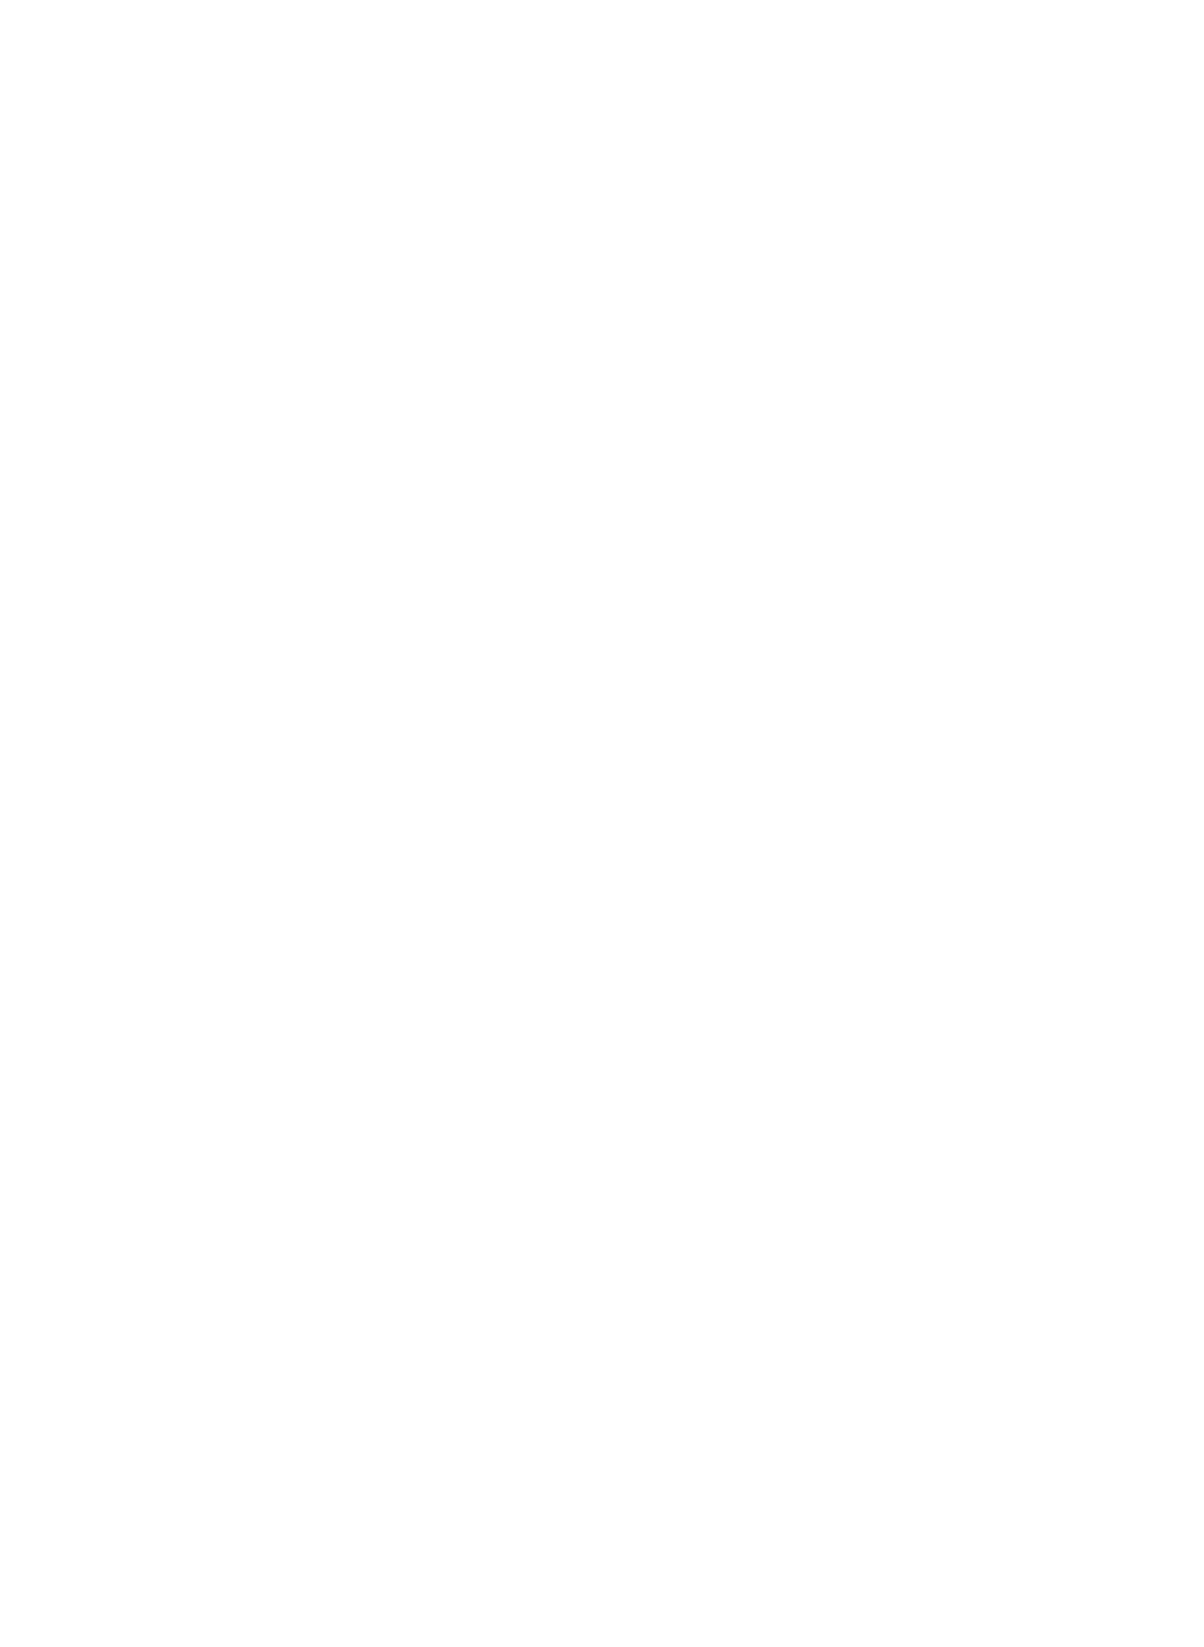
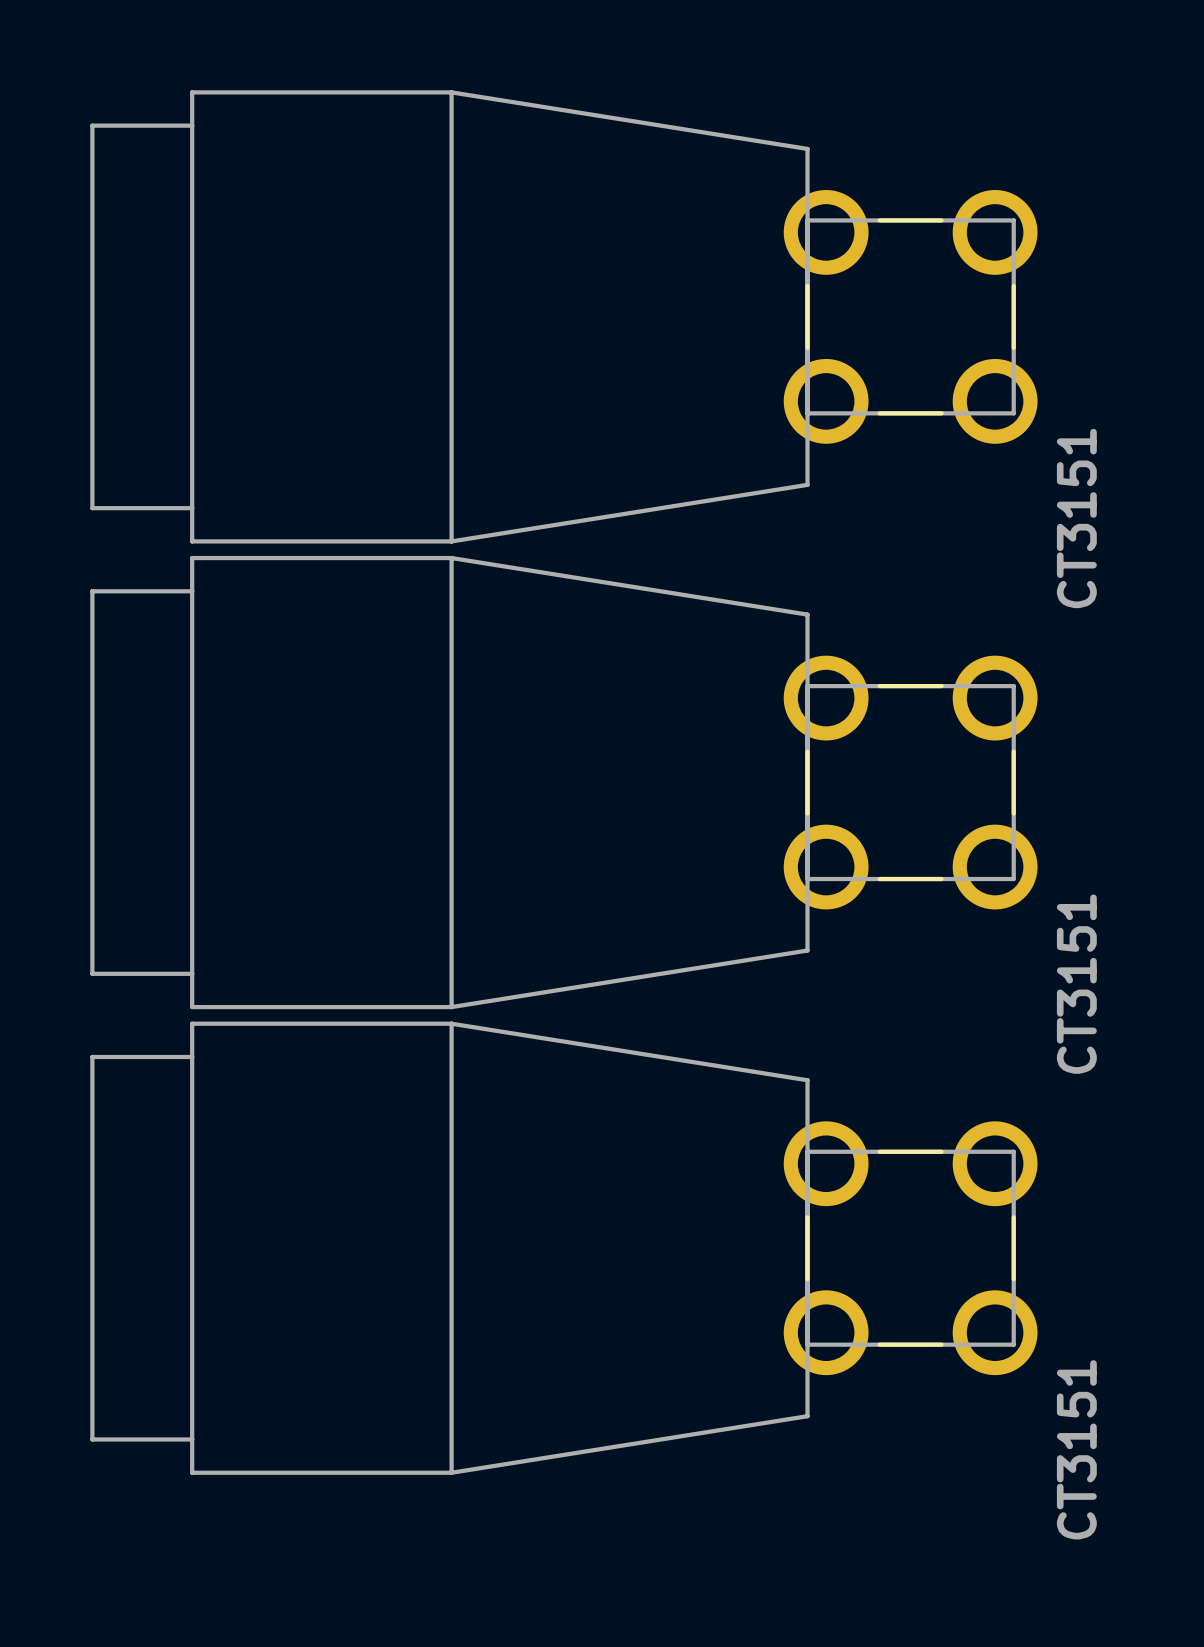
part: none -> CT3151 (563, 316)
part: none -> CT3151 (563, 782)
part: none -> CT3151 (563, 1248)

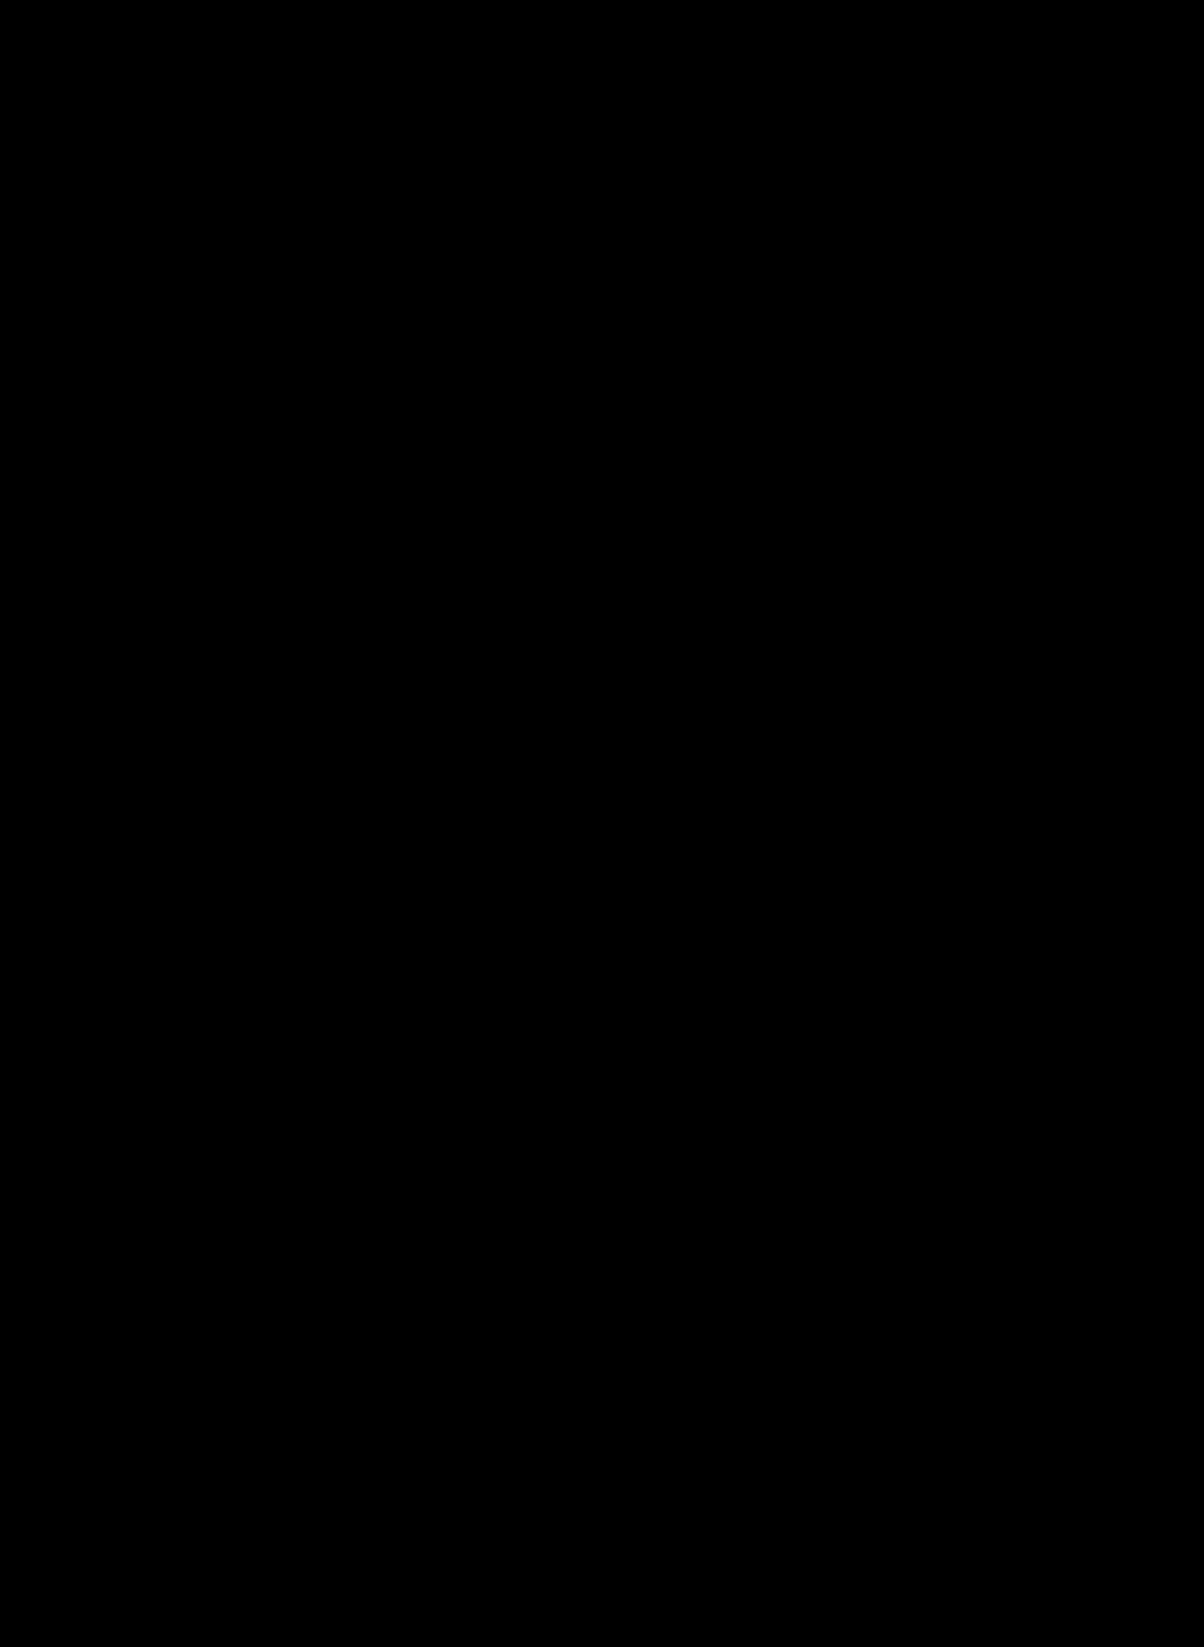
part: CT3151 (563, 316) -> none
part: CT3151 (563, 782) -> none
part: CT3151 (563, 1248) -> none

